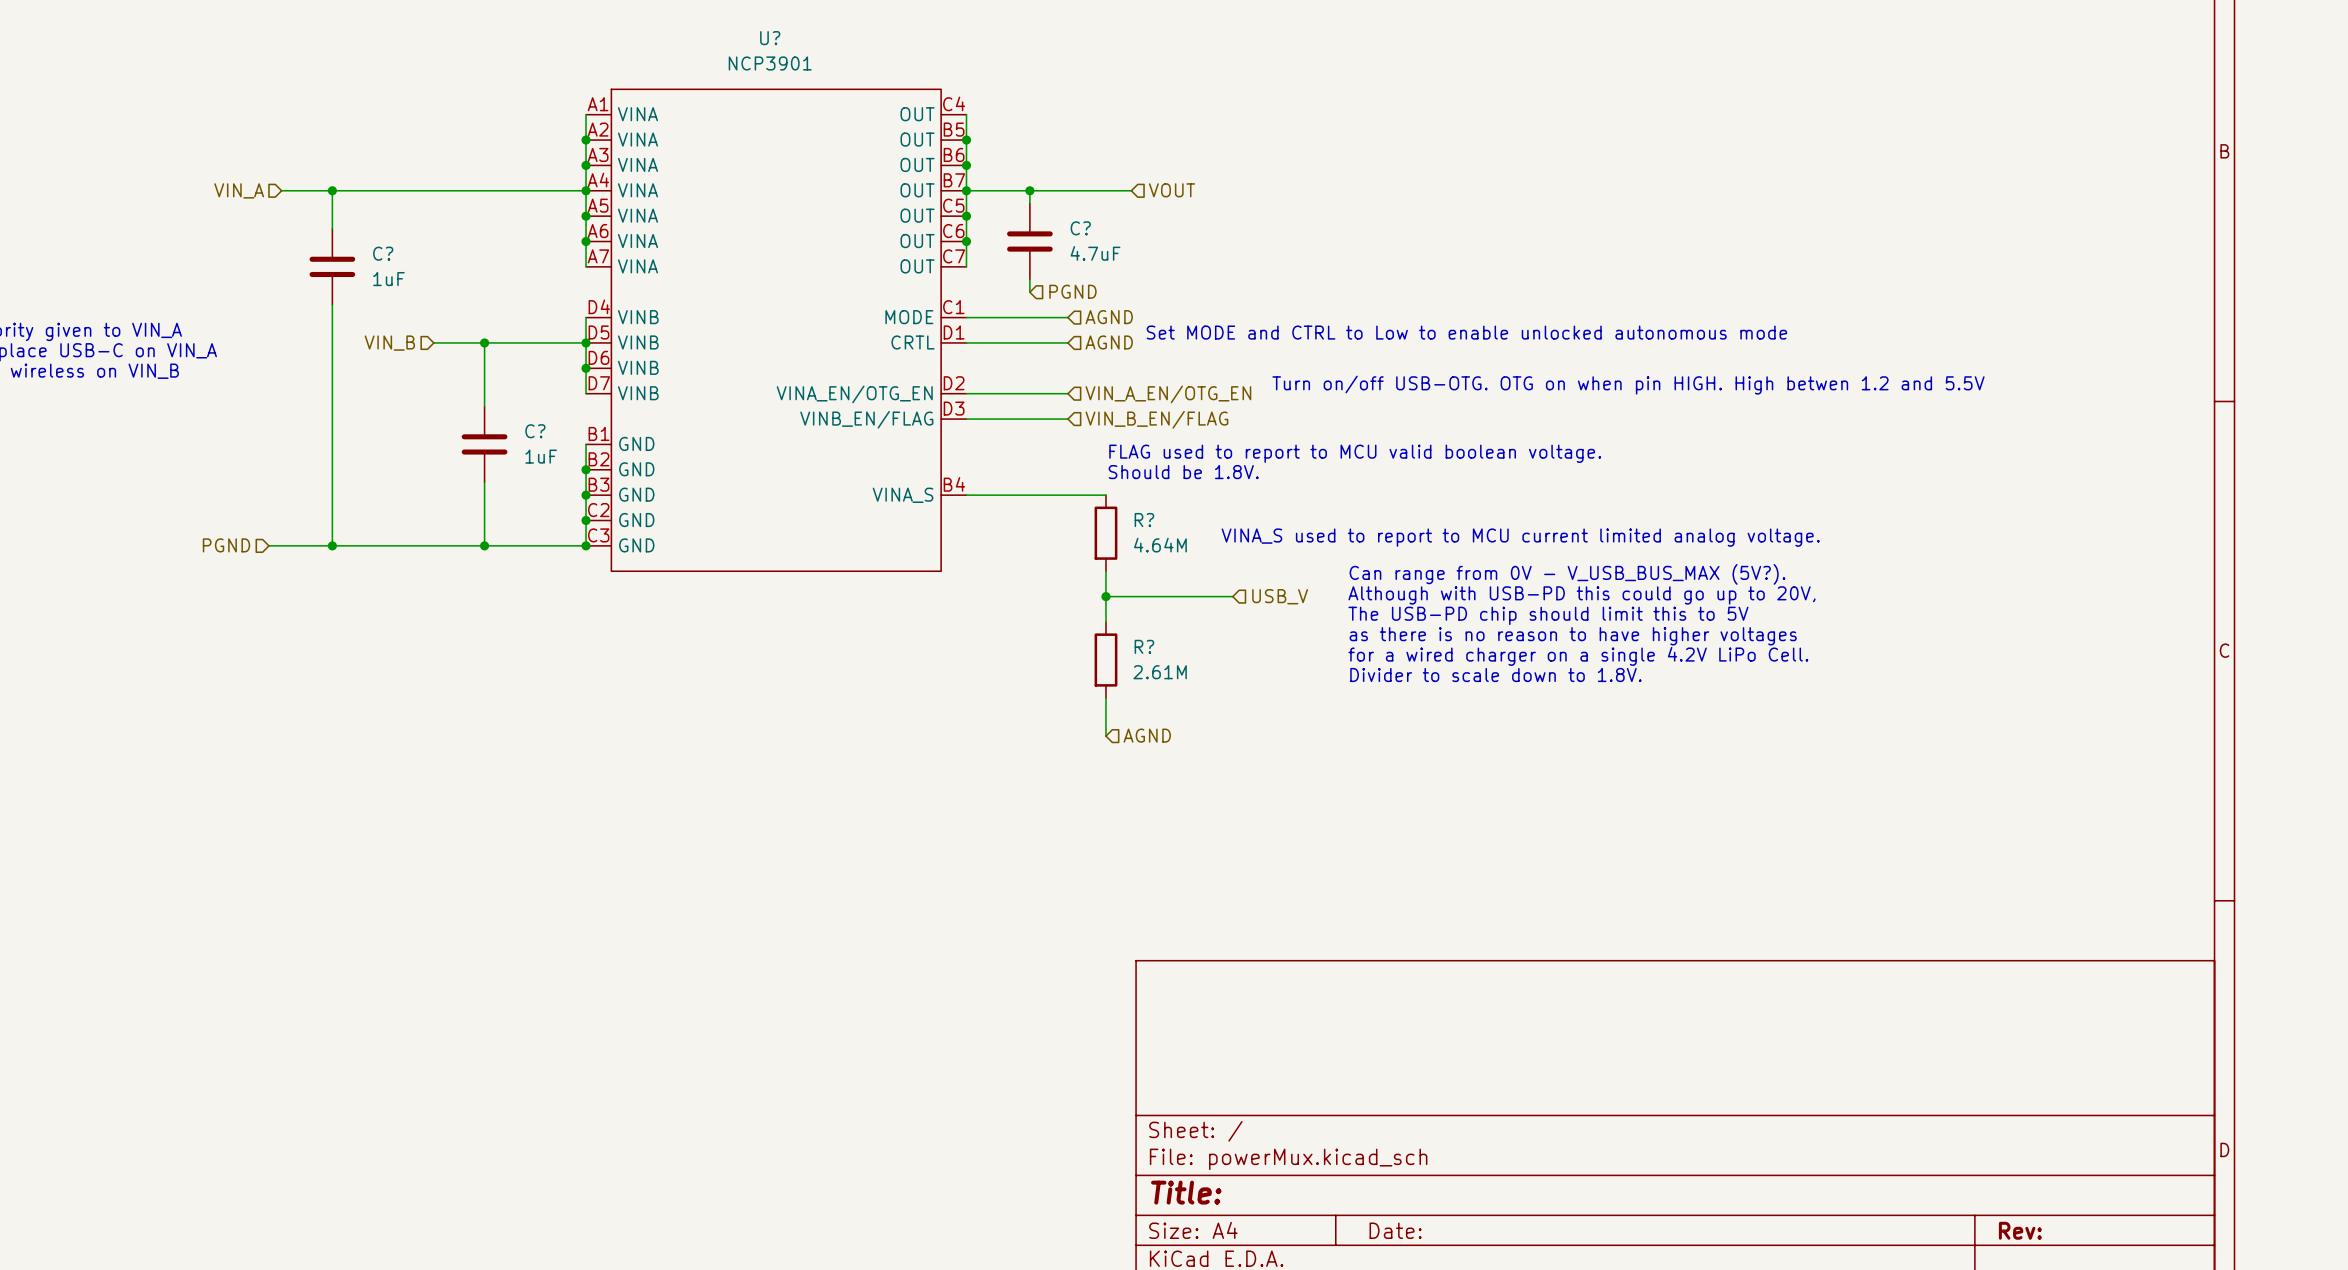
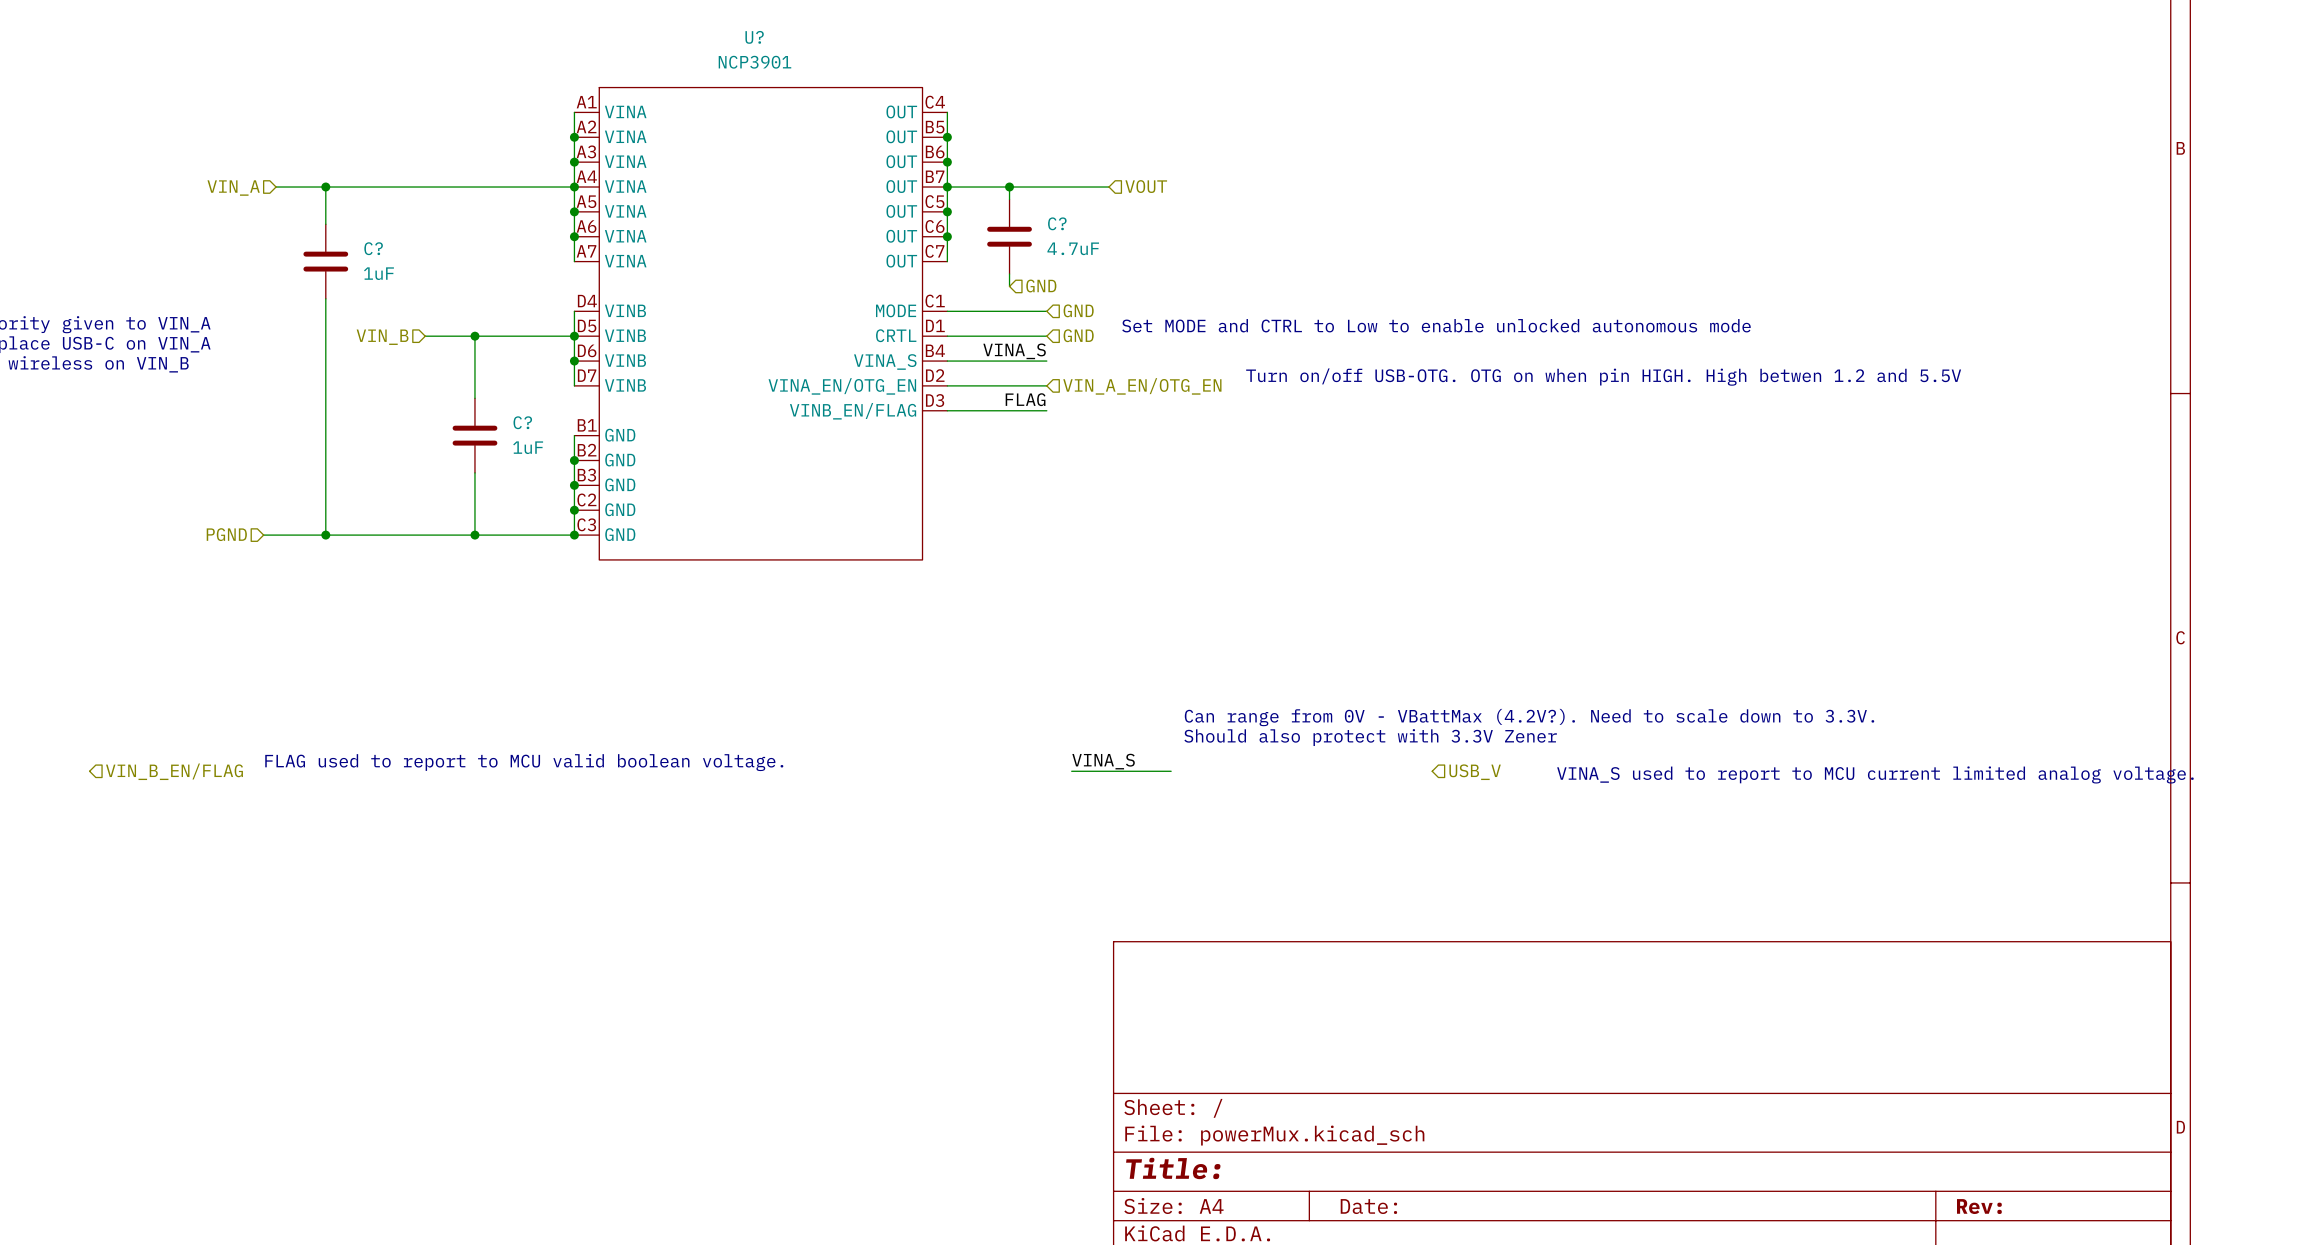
U? symbol: [586, 89, 967, 572] -> [574, 87, 948, 560]
hierarchical label: PGND (1072, 291) -> GND (1041, 285)
hierarchical label: AGND (1109, 317) -> GND (1078, 310)
hierarchical label: AGND (1109, 342) -> GND (1078, 335)
label: none -> VINA_S (1014, 351)
wire: none -> (947, 361) (1046, 361)
label: none -> FLAG (1025, 399)
hierarchical label: VIN_B_EN/FLAG (1156, 419) -> none
text: FLAG used to report to MCU valid boolean voltage. (1355, 453) -> none
text: Should be 1.8V. (1183, 472) -> none
wire: (966, 495) (1105, 495) -> none
R?: 4.64M (1105, 533) -> none
text: VINA_S used to report to MCU current limited analog voltage. (1520, 537) -> none
wire: (1105, 571) (1105, 621) -> none
text: Can range from 0V - V_USB_BUS_MAX (5V?). (1567, 574) -> none
text: Although with USB-PD this could go up to 20V, (1581, 595) -> none
wire: (1105, 596) (1232, 596) -> none
junction: (1105, 596) -> none
hierarchical label: USB_V (1280, 596) -> none
text: The USB-PD chip should limit this to 5V (1548, 615) -> none
text: as there is no reason to have higher voltages (1573, 636) -> none
text: for a wired charger on a single 4.2V LiPo Cell. (1578, 656) -> none
R?: 2.61M (1105, 660) -> none
text: Divider to scale down to 1.8V. (1495, 674) -> none
wire: (1105, 698) (1105, 736) -> none
text: none -> Can range from 0V - VBattMax (4.2V?). Need to scale down to 3.3V. (1529, 717)
hierarchical label: AGND (1147, 735) -> none
text: none -> Should also protect with 3.3V Zener (1370, 737)
label: none -> VINA_S (1103, 761)
text: none -> FLAG used to report to MCU valid boolean voltage. (524, 762)
wire: none -> (1071, 771) (1171, 771)
hierarchical label: none -> USB_V (1475, 772)
hierarchical label: none -> VIN_B_EN/FLAG (174, 771)
text: none -> VINA_S used to report to MCU current limited analog voltage. (1875, 774)

